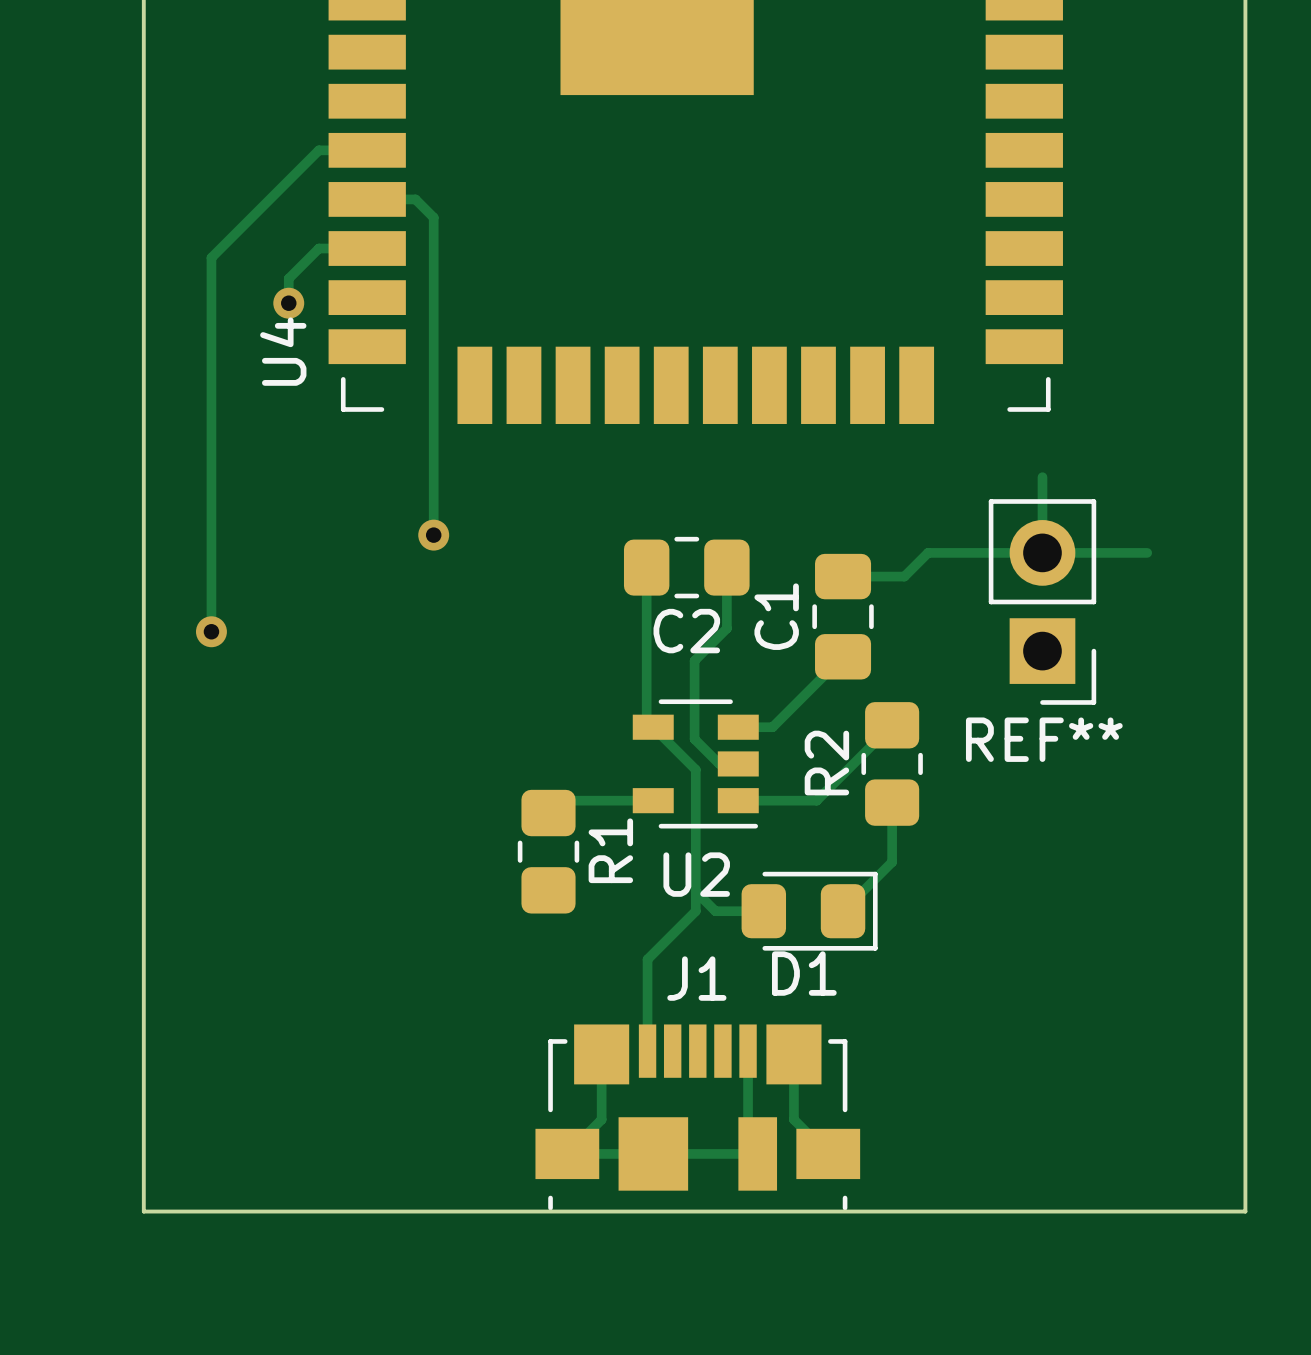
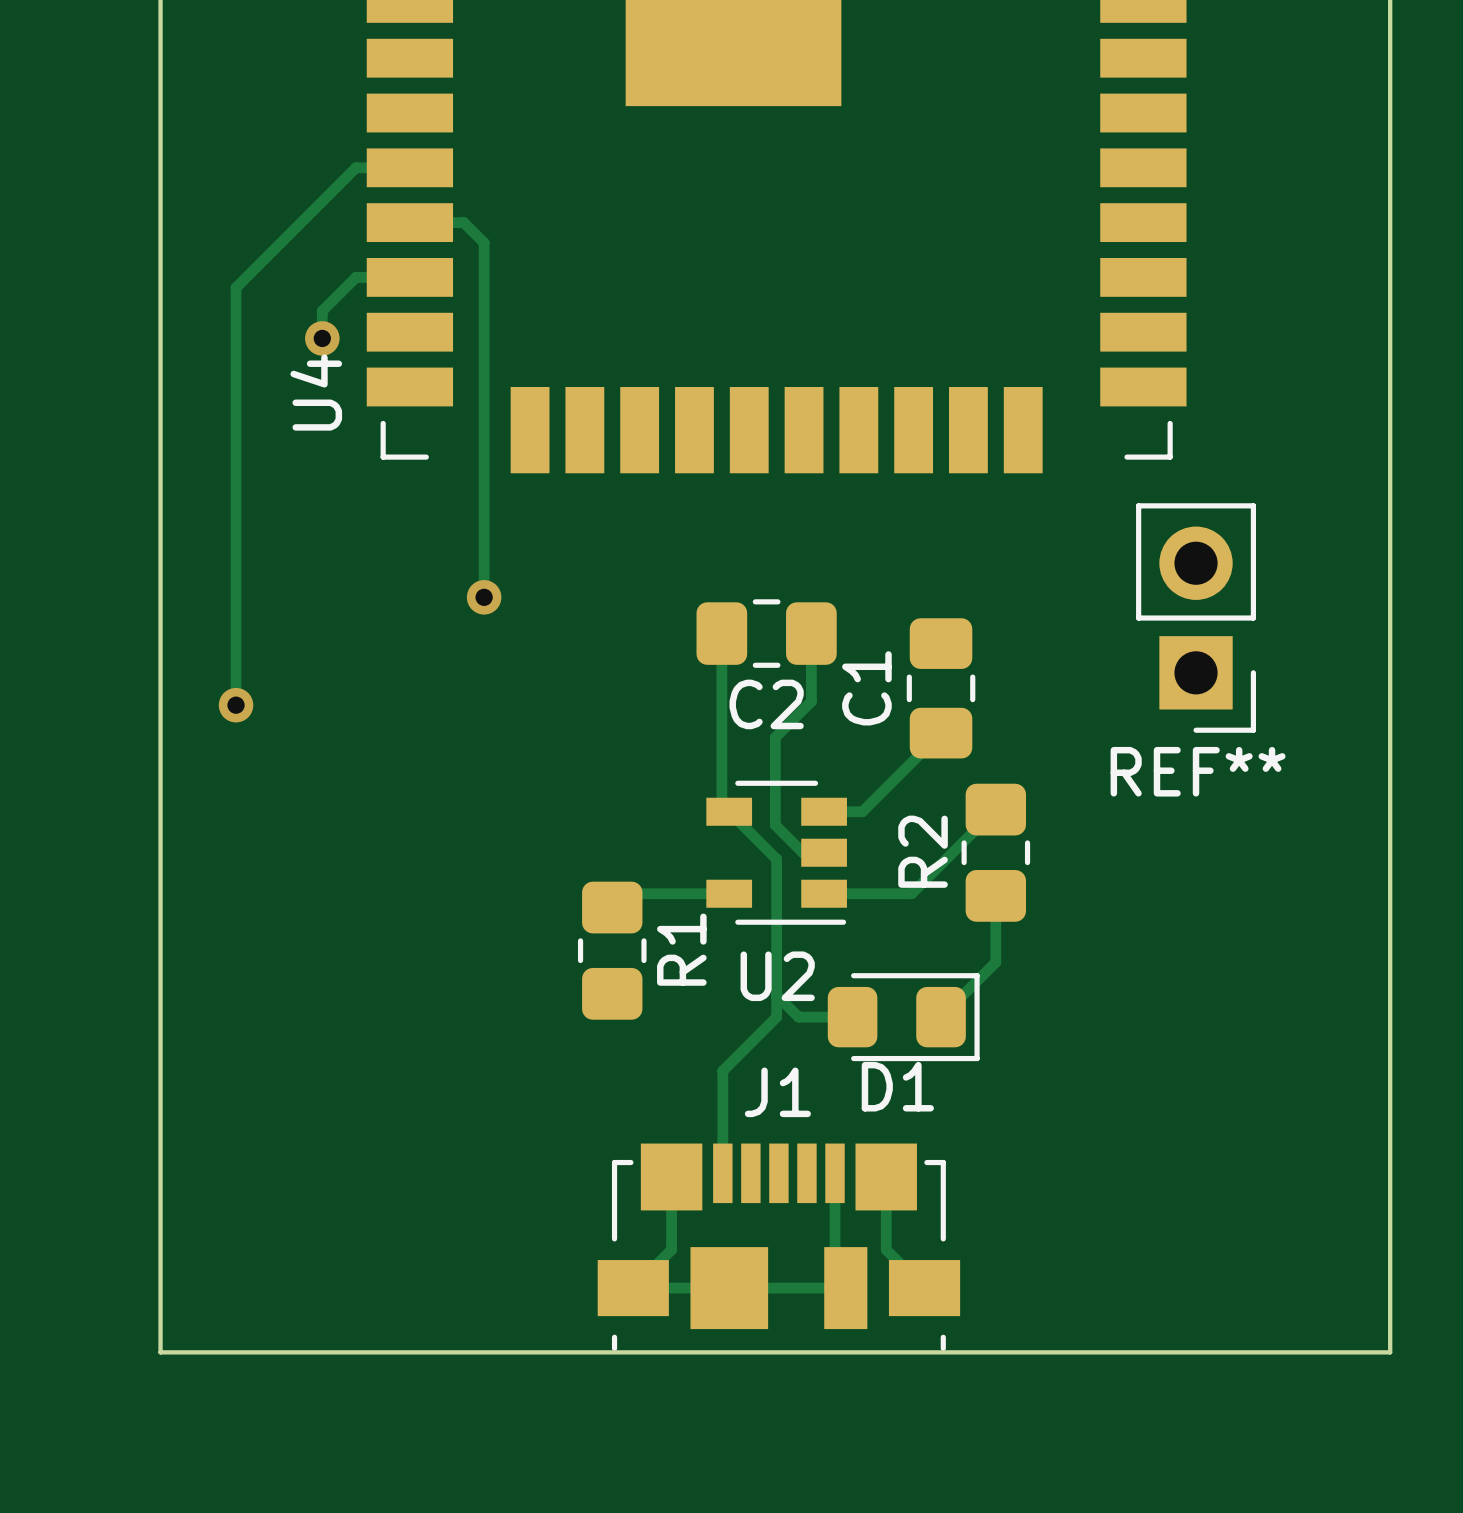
track: (1042, 477) (1042, 552) -> none
track: (1147, 552) (928, 552) (904, 576) (843, 576) -> none
REF** position: (1042, 601) -> (1196, 618)

